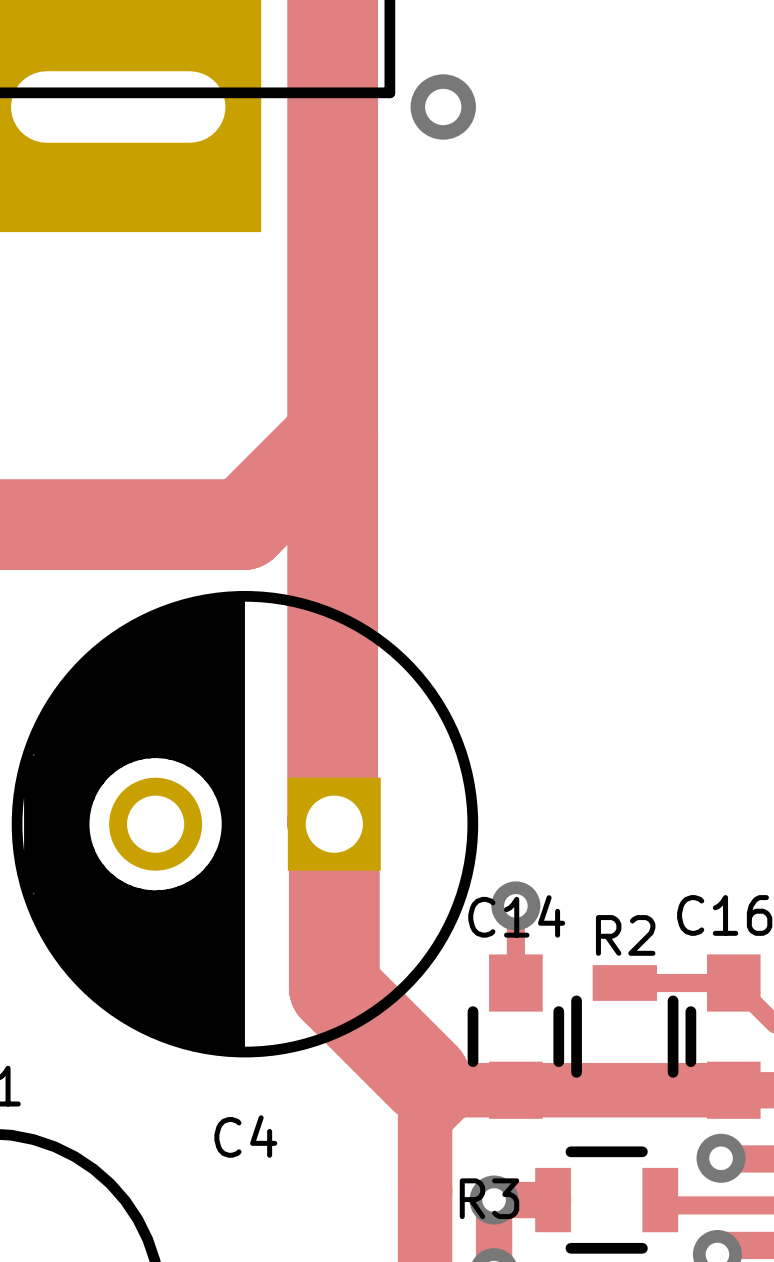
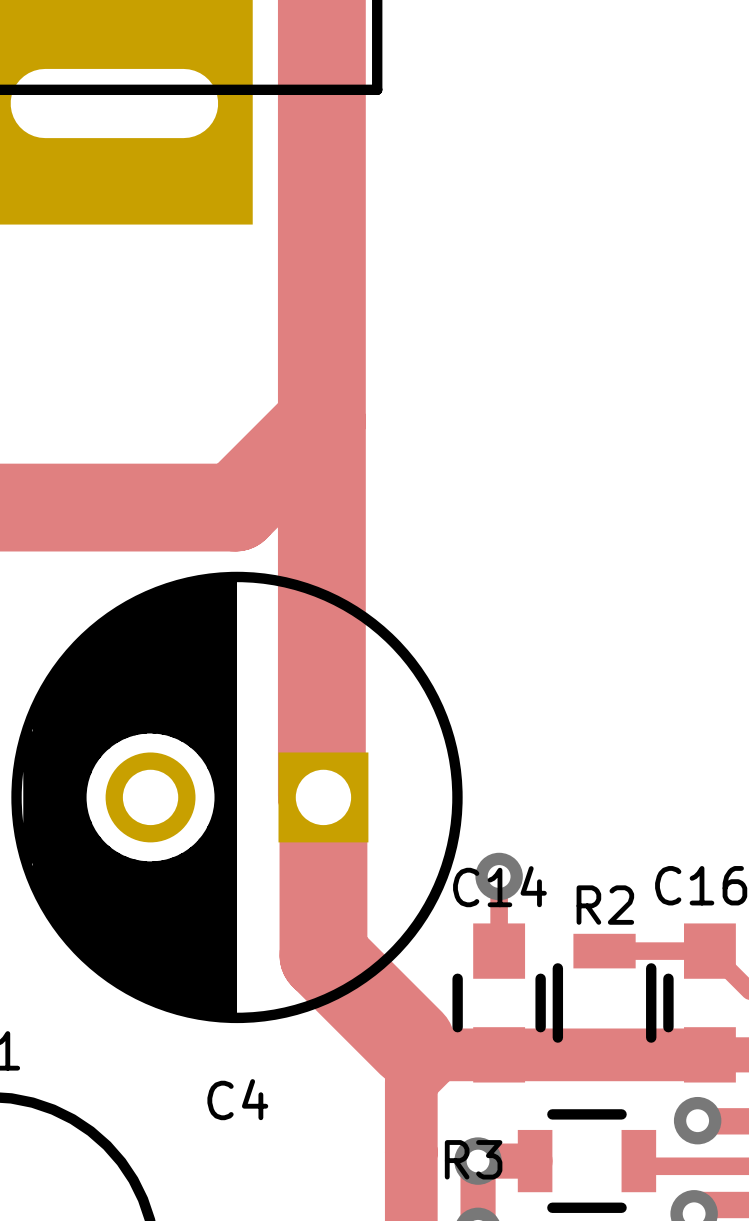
via: (443, 106) -> none

